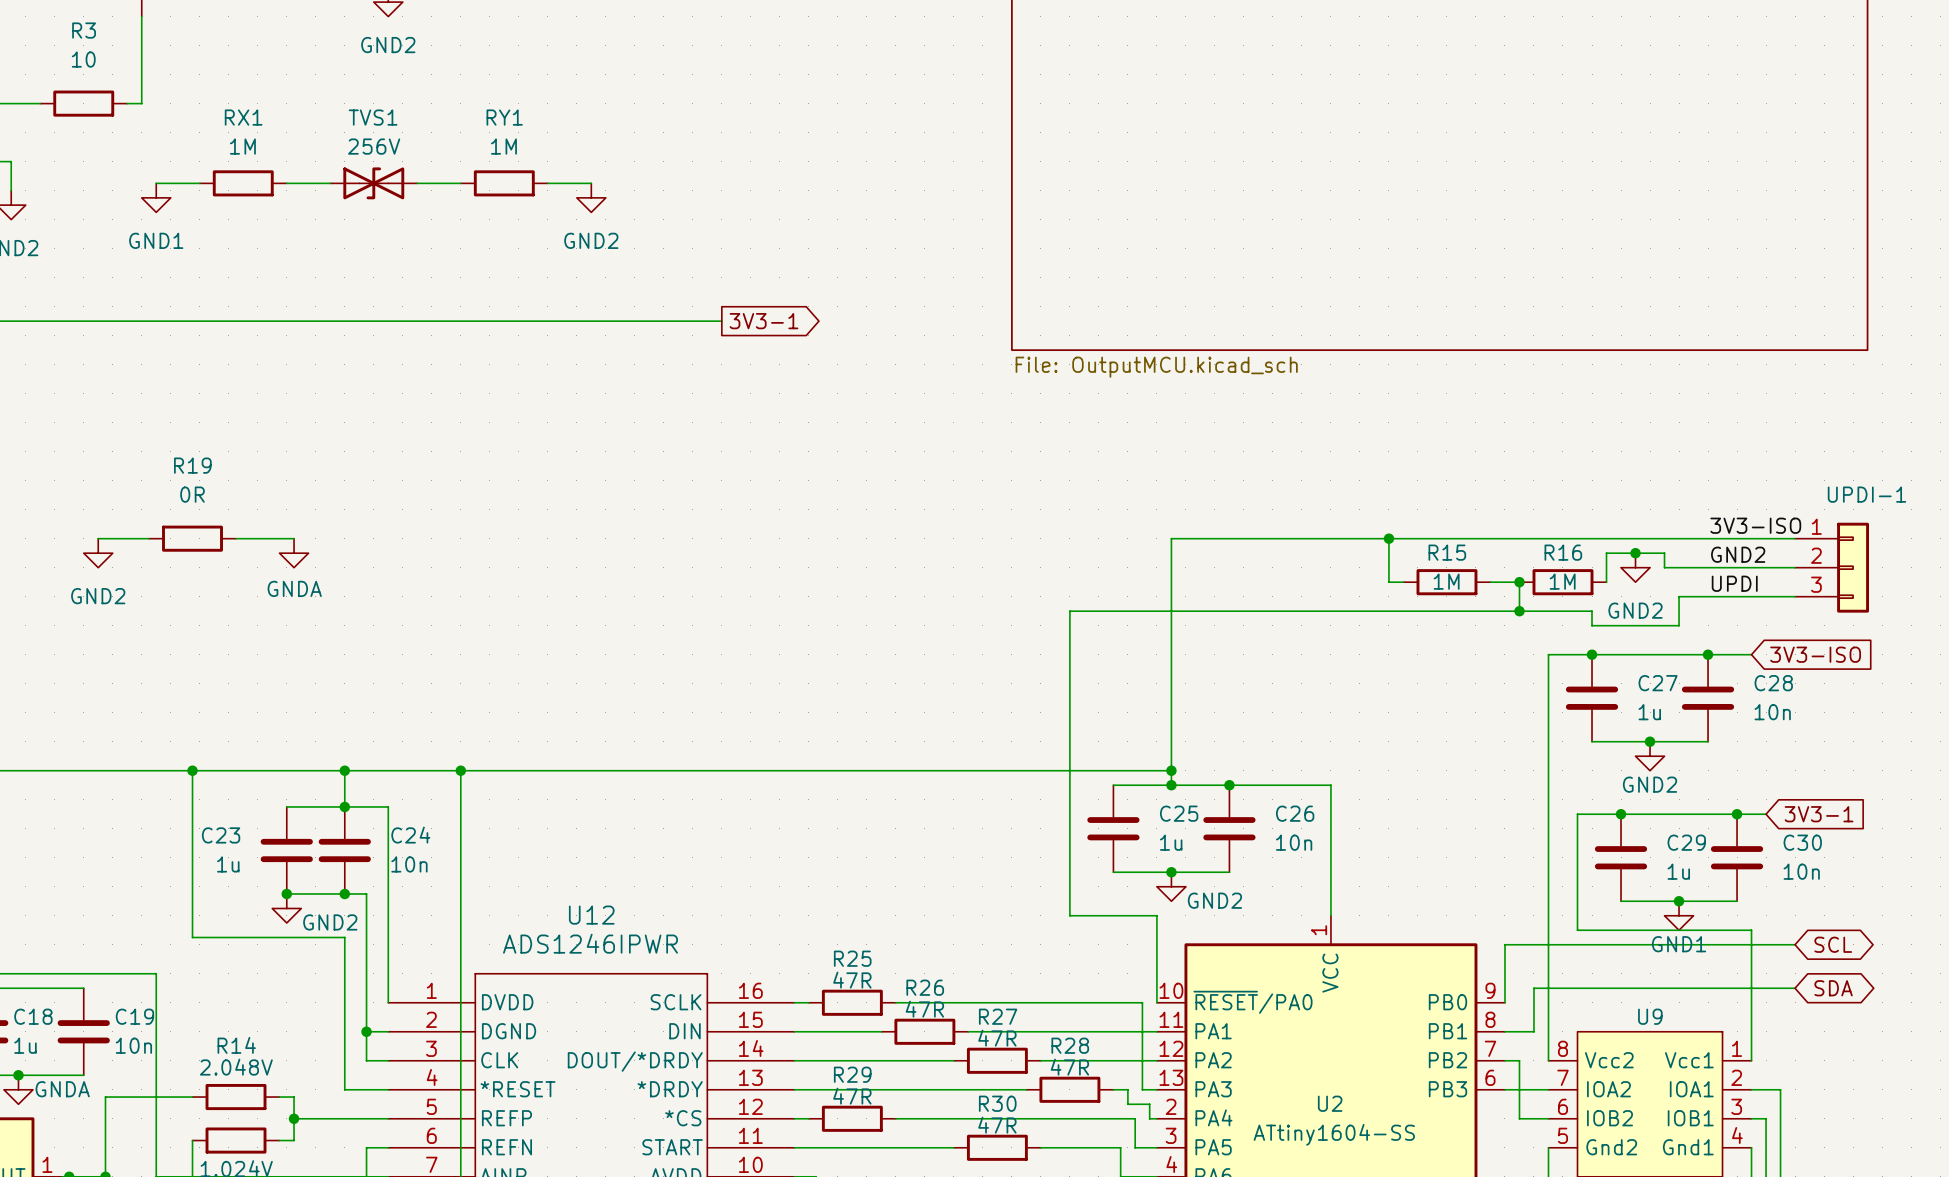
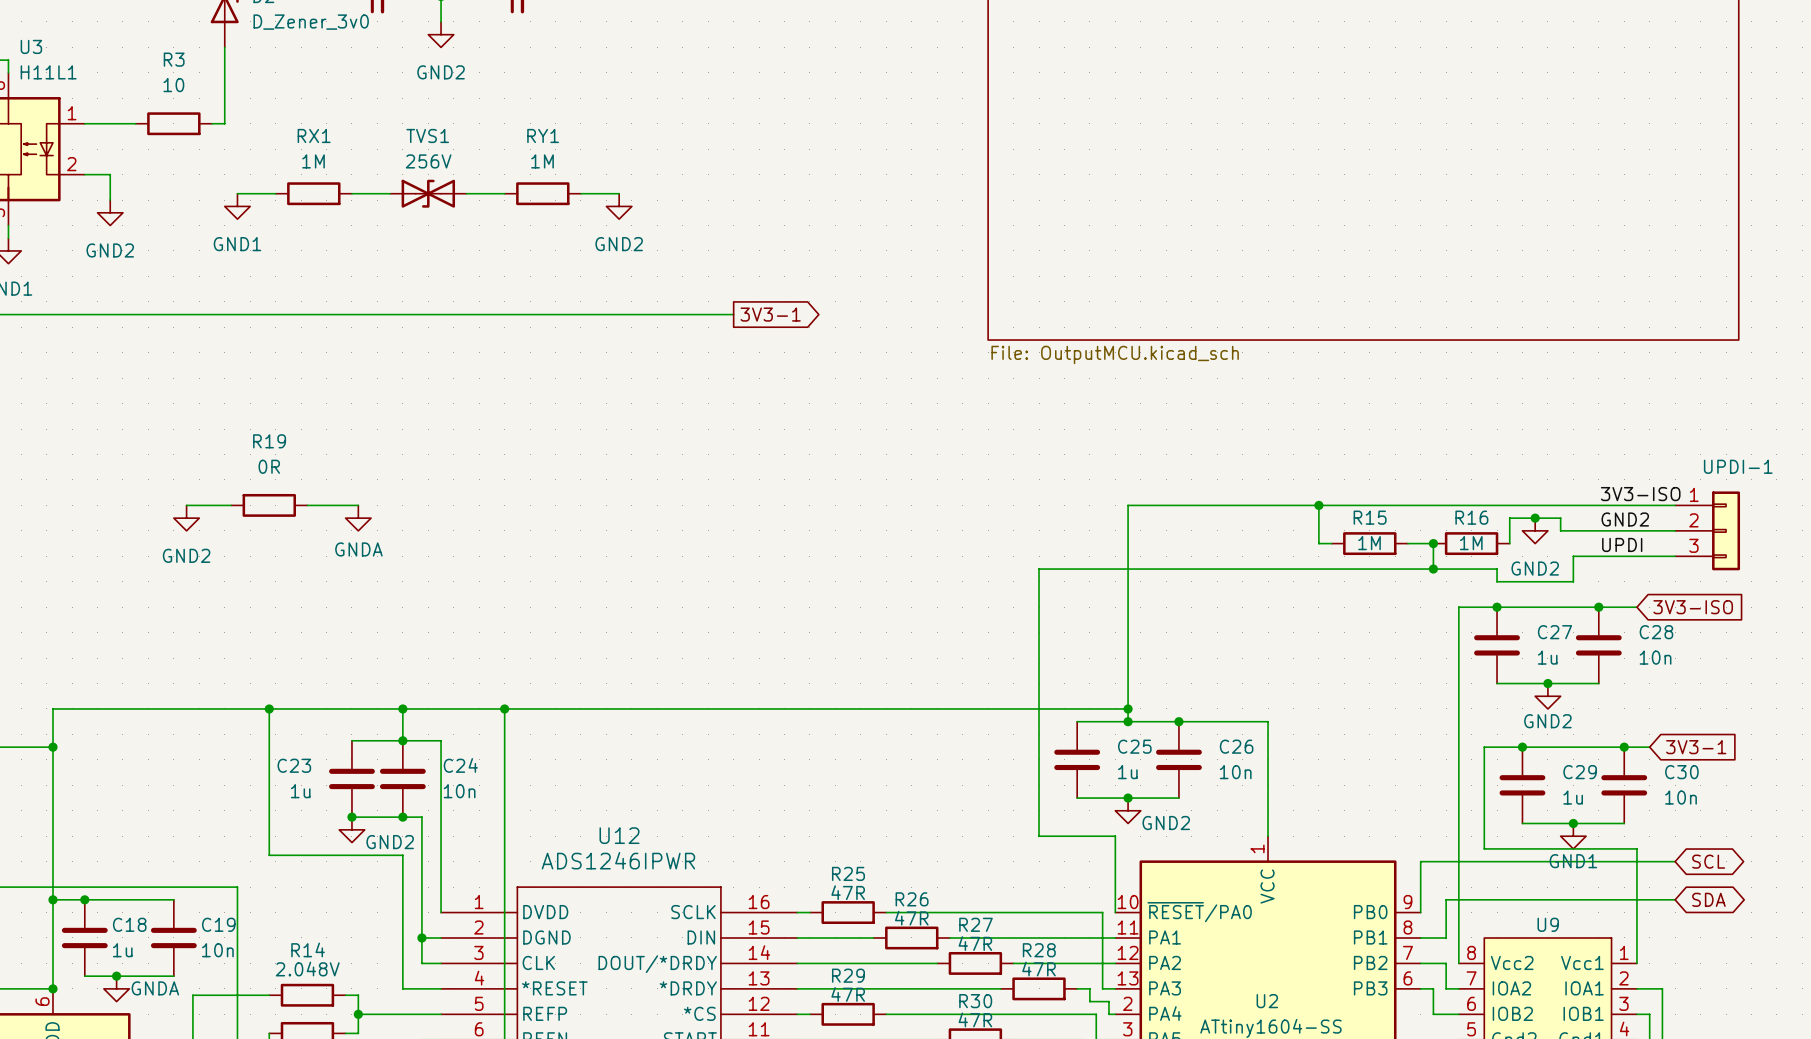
wire: (1519, 1060) (1519, 1089) (1533, 1089) -> (1433, 963) (1446, 963) (1446, 988)

